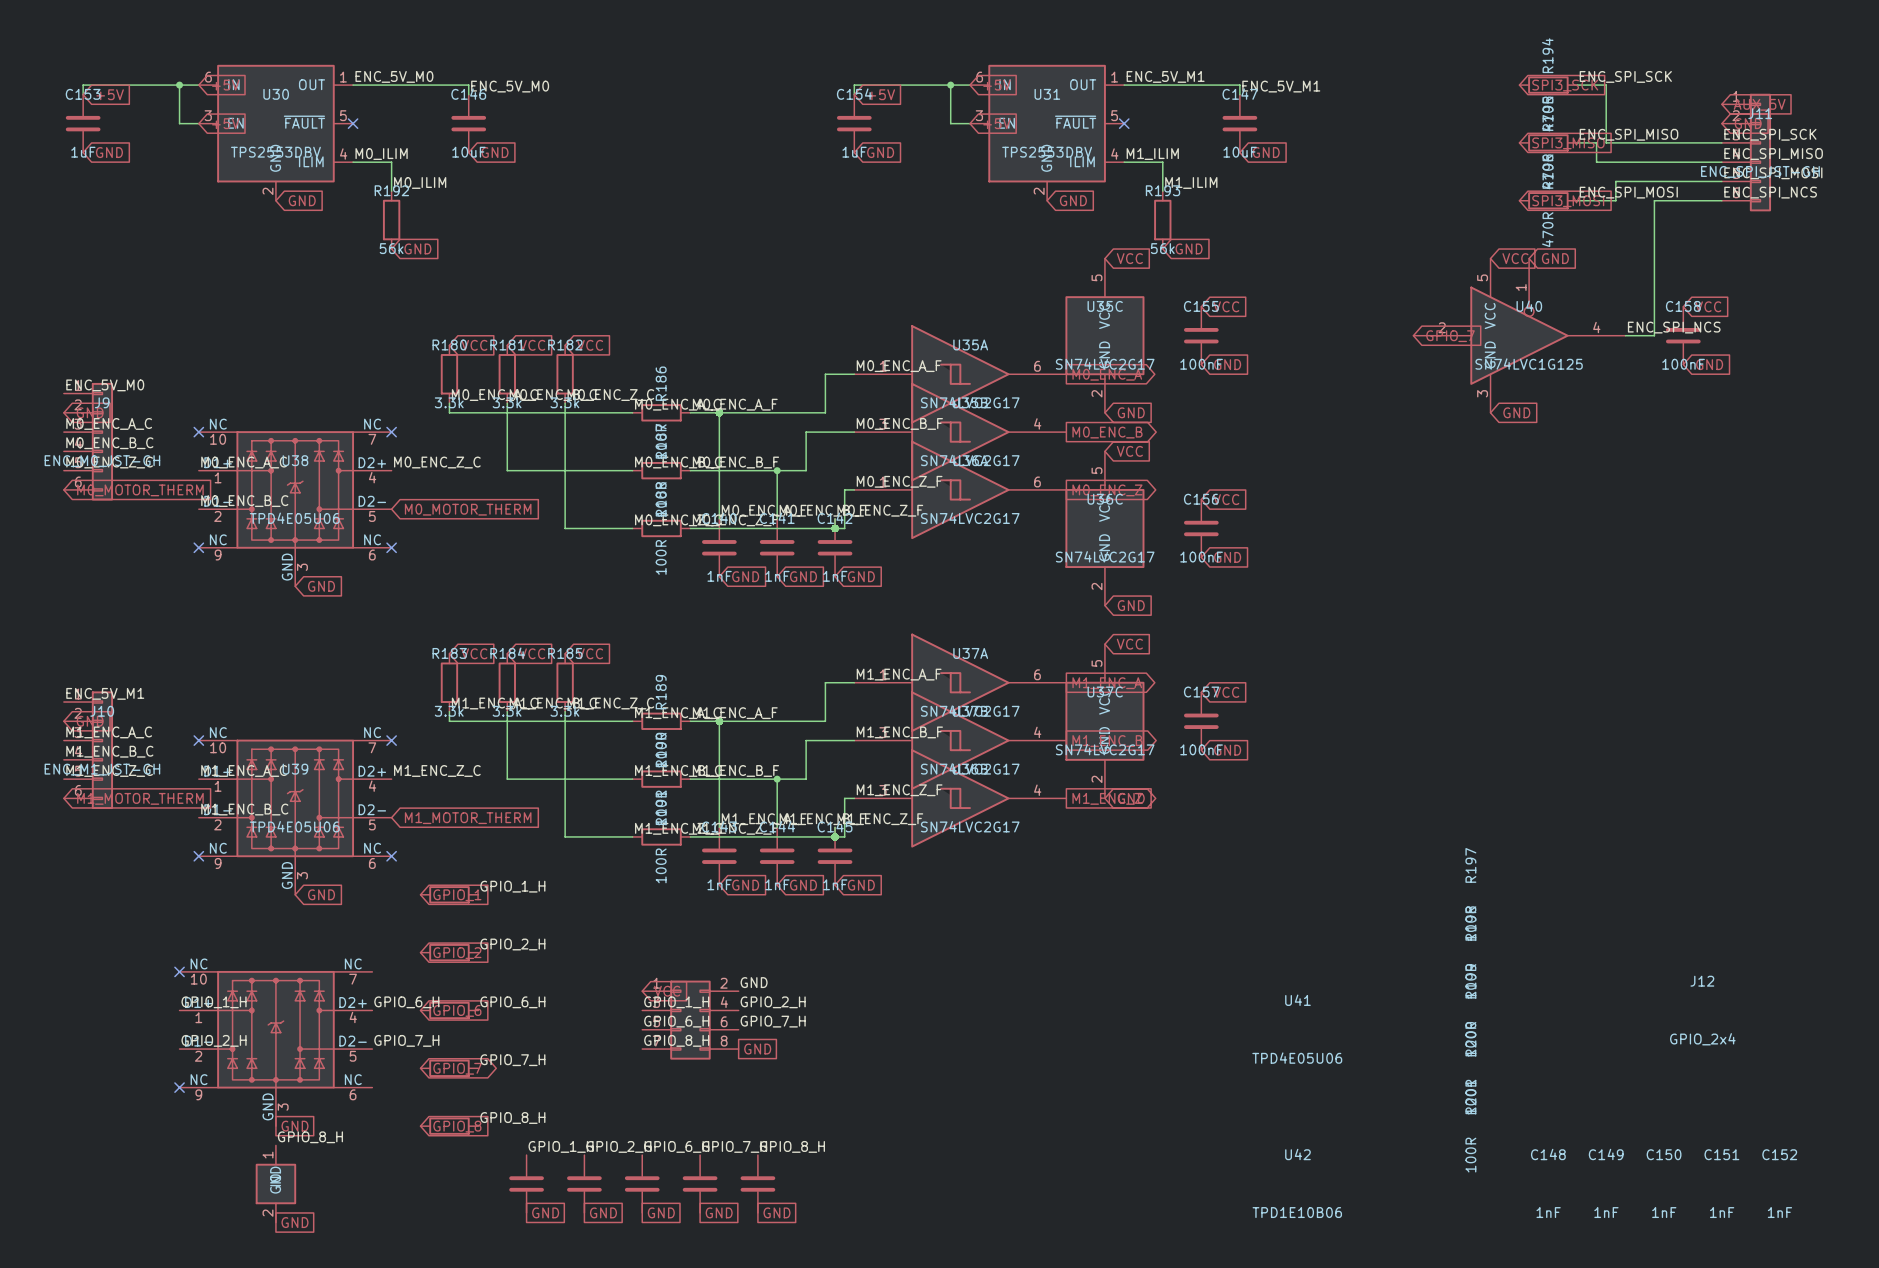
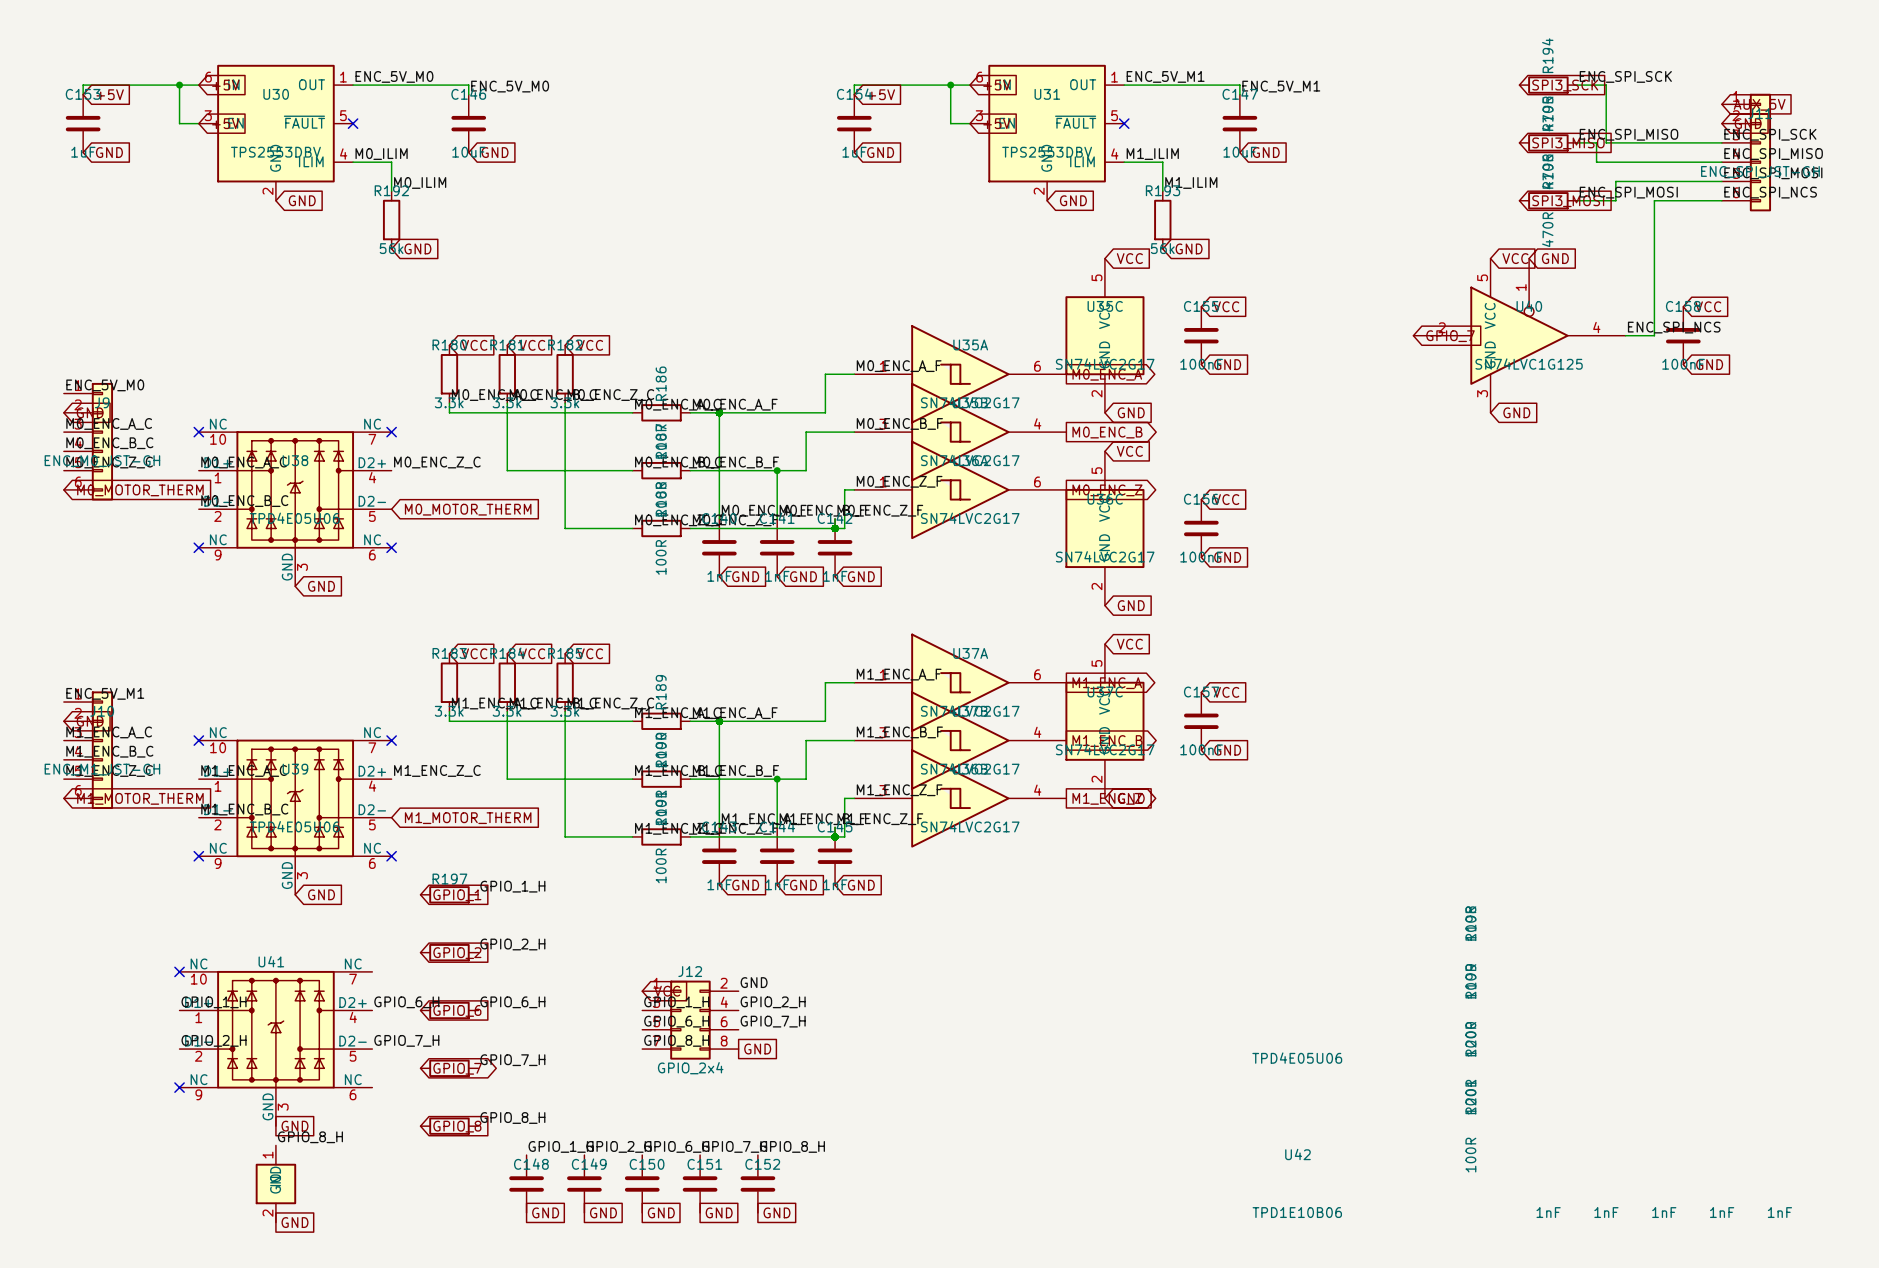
R197 name rotation: 0° (1470, 865) -> 90° clockwise (449, 879)
R197 name position: R197 (1470, 865) -> R197 (449, 879)
J12 name position: J12 (1702, 981) -> J12 (690, 971)
U41 name position: U41 (1297, 1000) -> U41 (271, 961)
J12 value position: GPIO_2x4 (1702, 1039) -> GPIO_2x4 (690, 1068)
C148 name position: C148 (1548, 1154) -> C148 (531, 1164)
C149 name position: C149 (1606, 1154) -> C149 (589, 1164)
C150 name position: C150 (1664, 1154) -> C150 (647, 1164)
C151 name position: C151 (1721, 1154) -> C151 (704, 1164)
C152 name position: C152 (1779, 1154) -> C152 (762, 1164)

